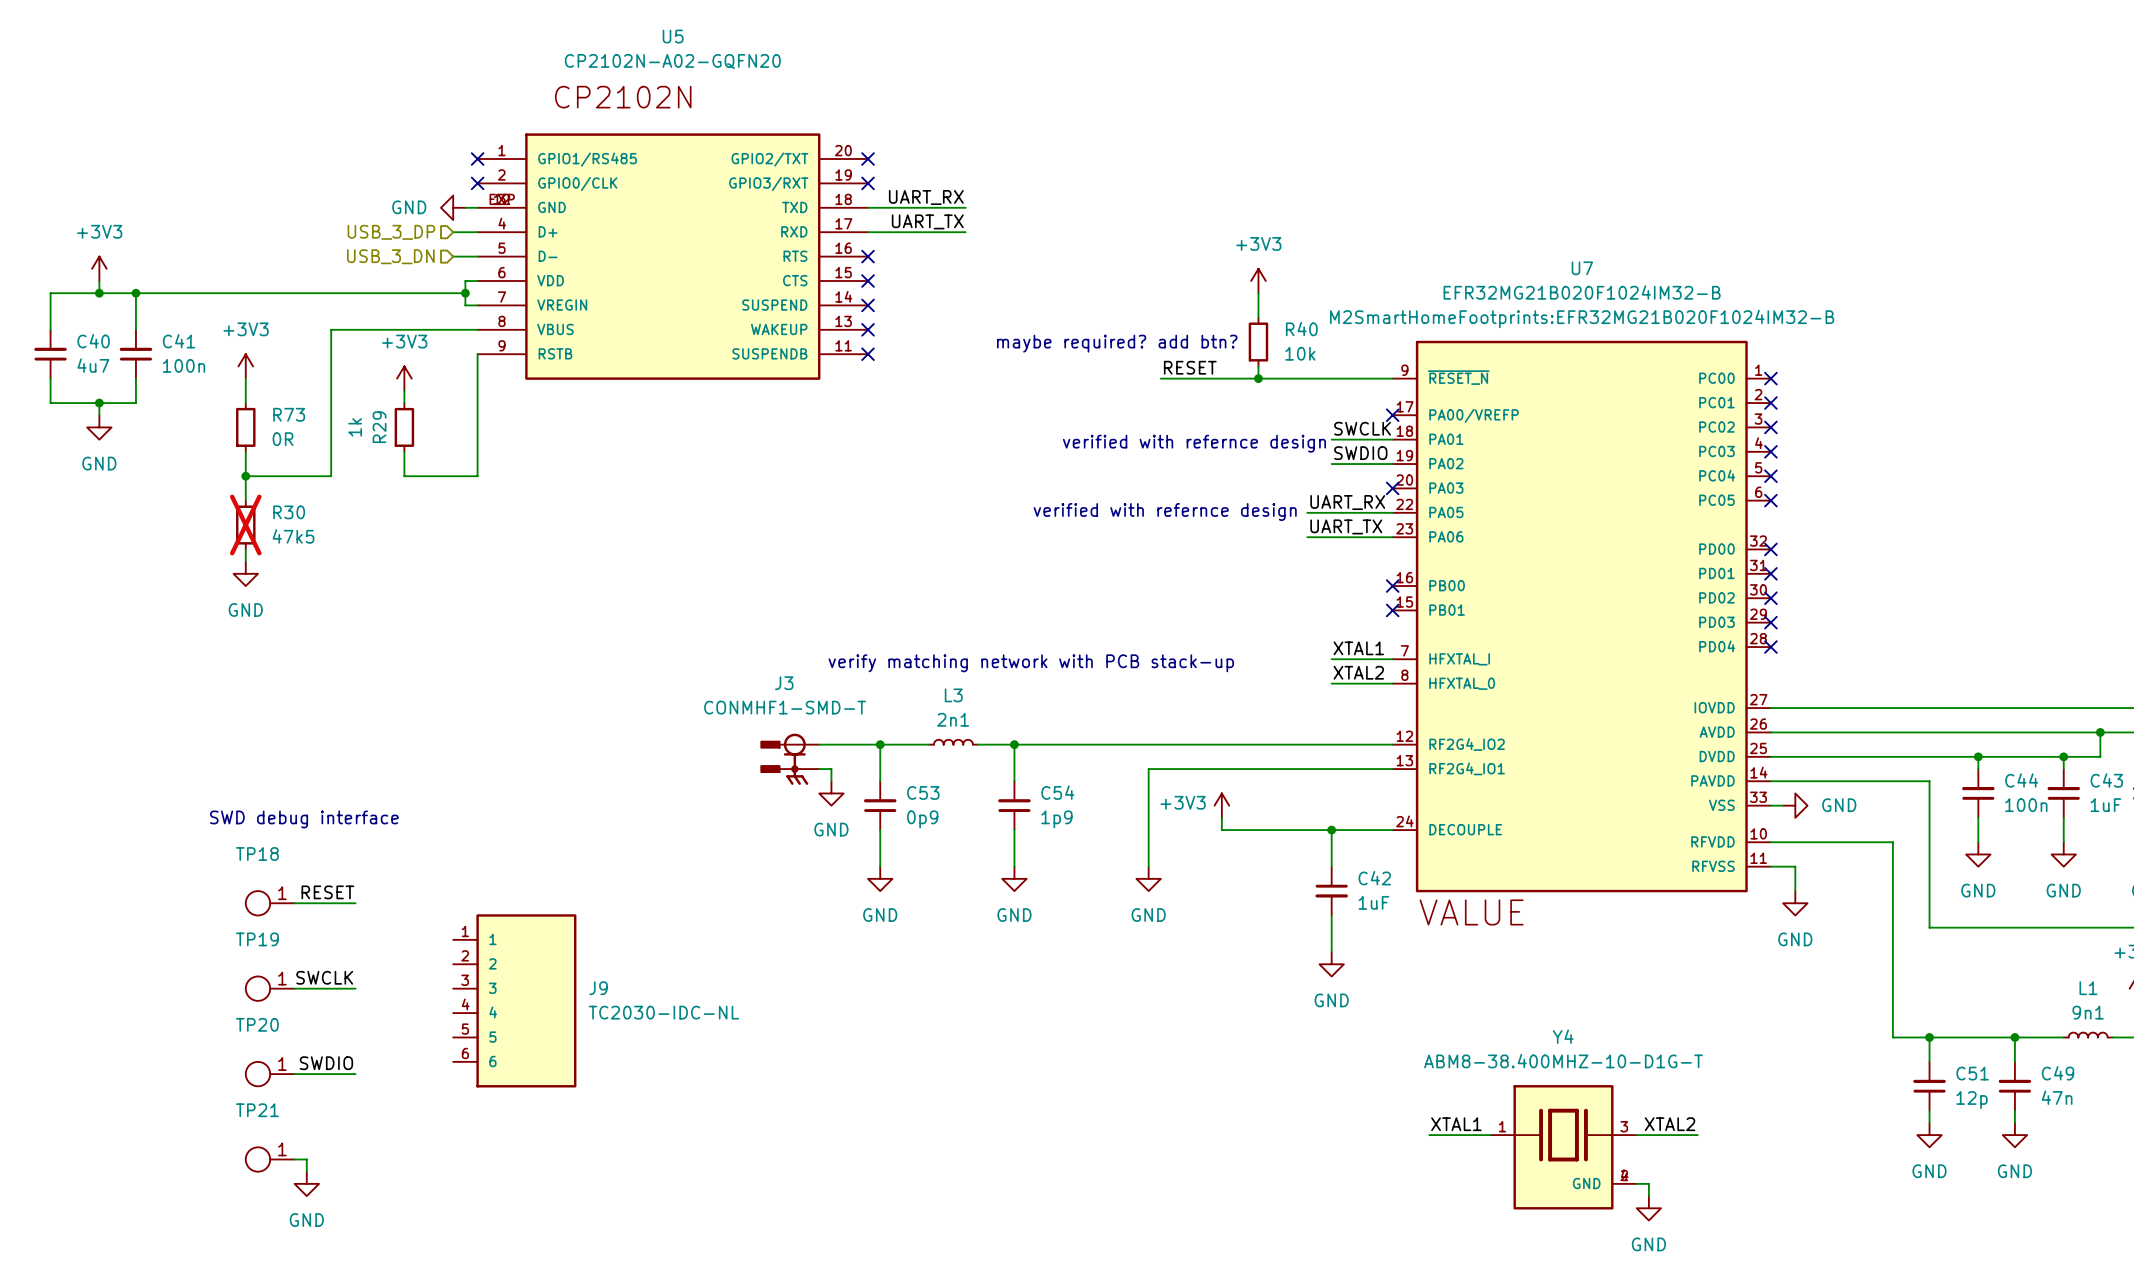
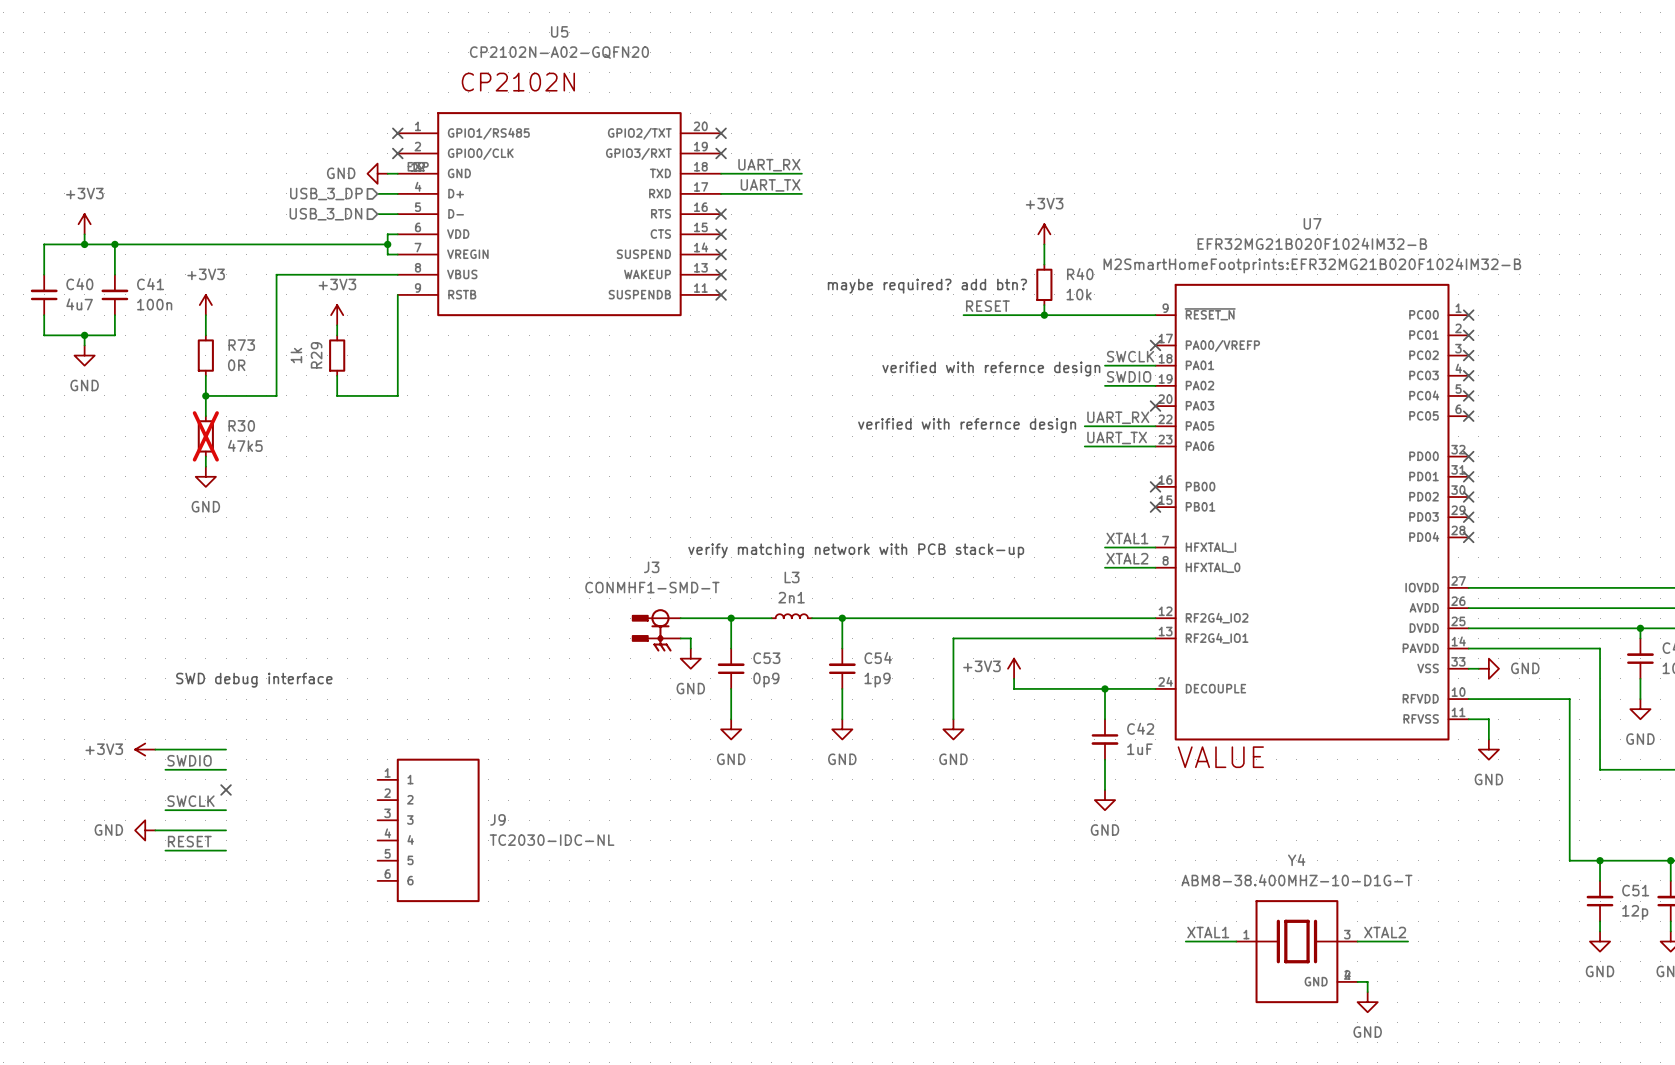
label position: RESET (327, 892) -> RESET (189, 841)
power symbol: none -> +3V3 (145, 749)
wire: none -> (155, 749) (226, 749)
TP18: (270, 903) -> none
wire: (294, 903) (355, 903) -> none
wire: none -> (165, 769) (226, 769)
no-connect mark: none -> (226, 789)
wire: none -> (165, 810) (226, 810)
label position: SWCLK (324, 977) -> SWCLK (191, 801)
TP19: (270, 988) -> none
wire: (294, 988) (355, 988) -> none
wire: none -> (155, 830) (226, 830)
wire: none -> (165, 850) (226, 850)
label position: SWDIO (326, 1063) -> SWDIO (189, 760)
TP20: (270, 1074) -> none
wire: (294, 1074) (355, 1074) -> none
TP21: (270, 1159) -> none
wire: (294, 1159) (306, 1159) (306, 1171) -> none
power symbol rotation: 0° (306, 1183) -> 90° clockwise (145, 830)
power symbol position: GND (306, 1183) -> GND (145, 830)

